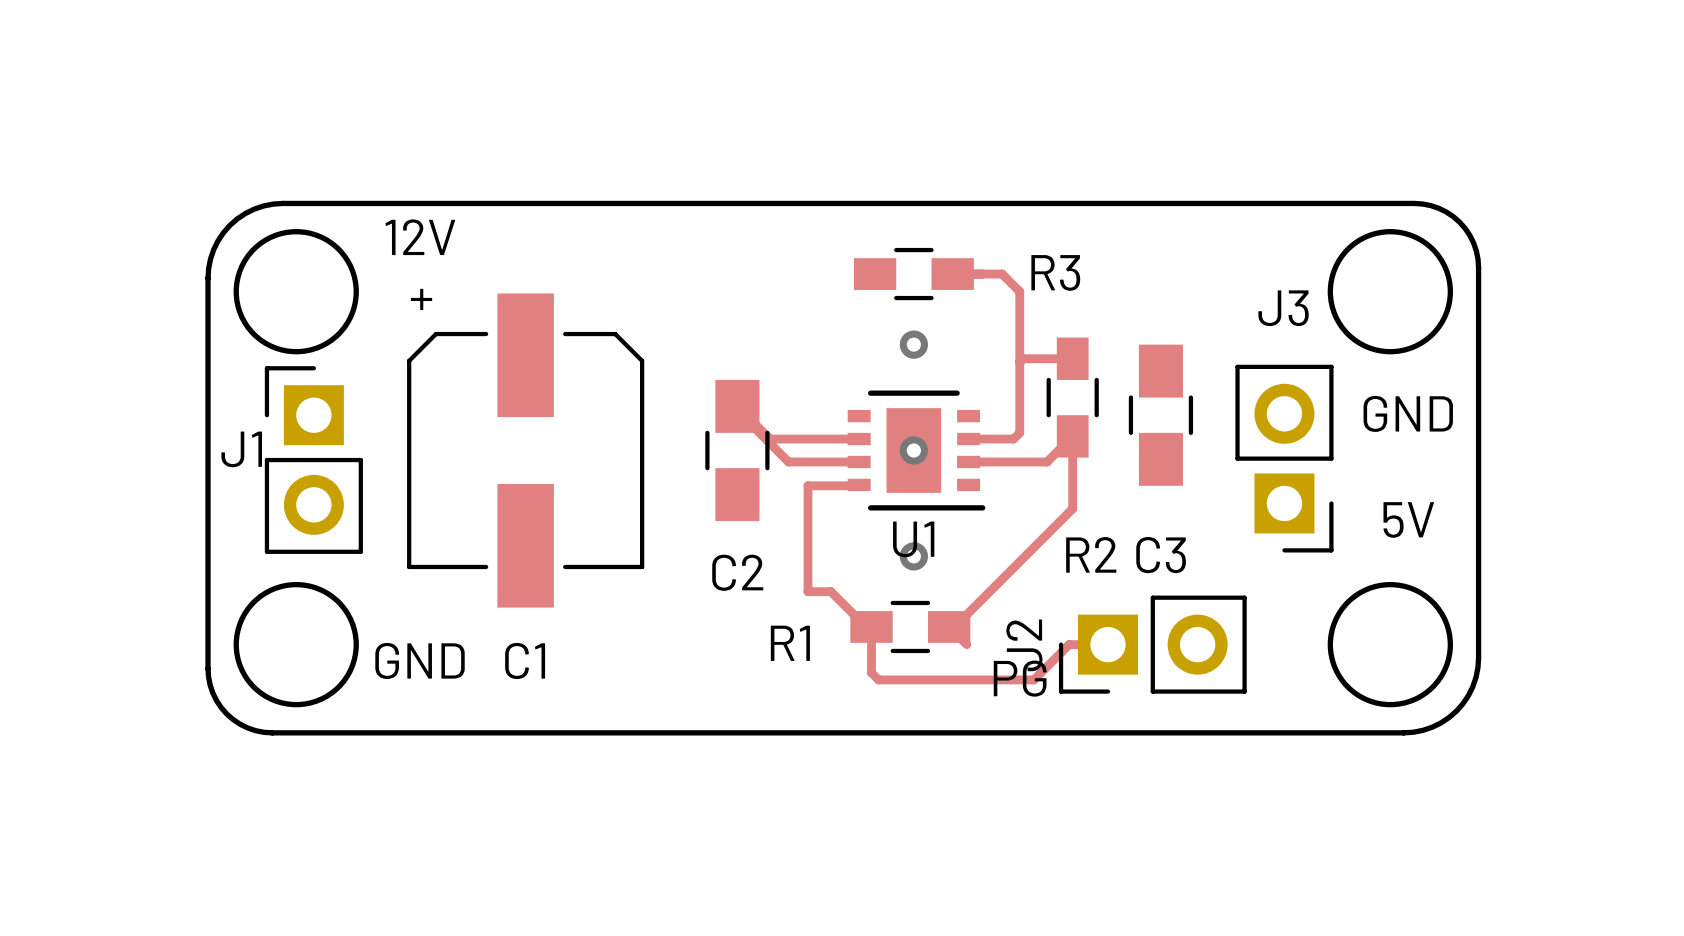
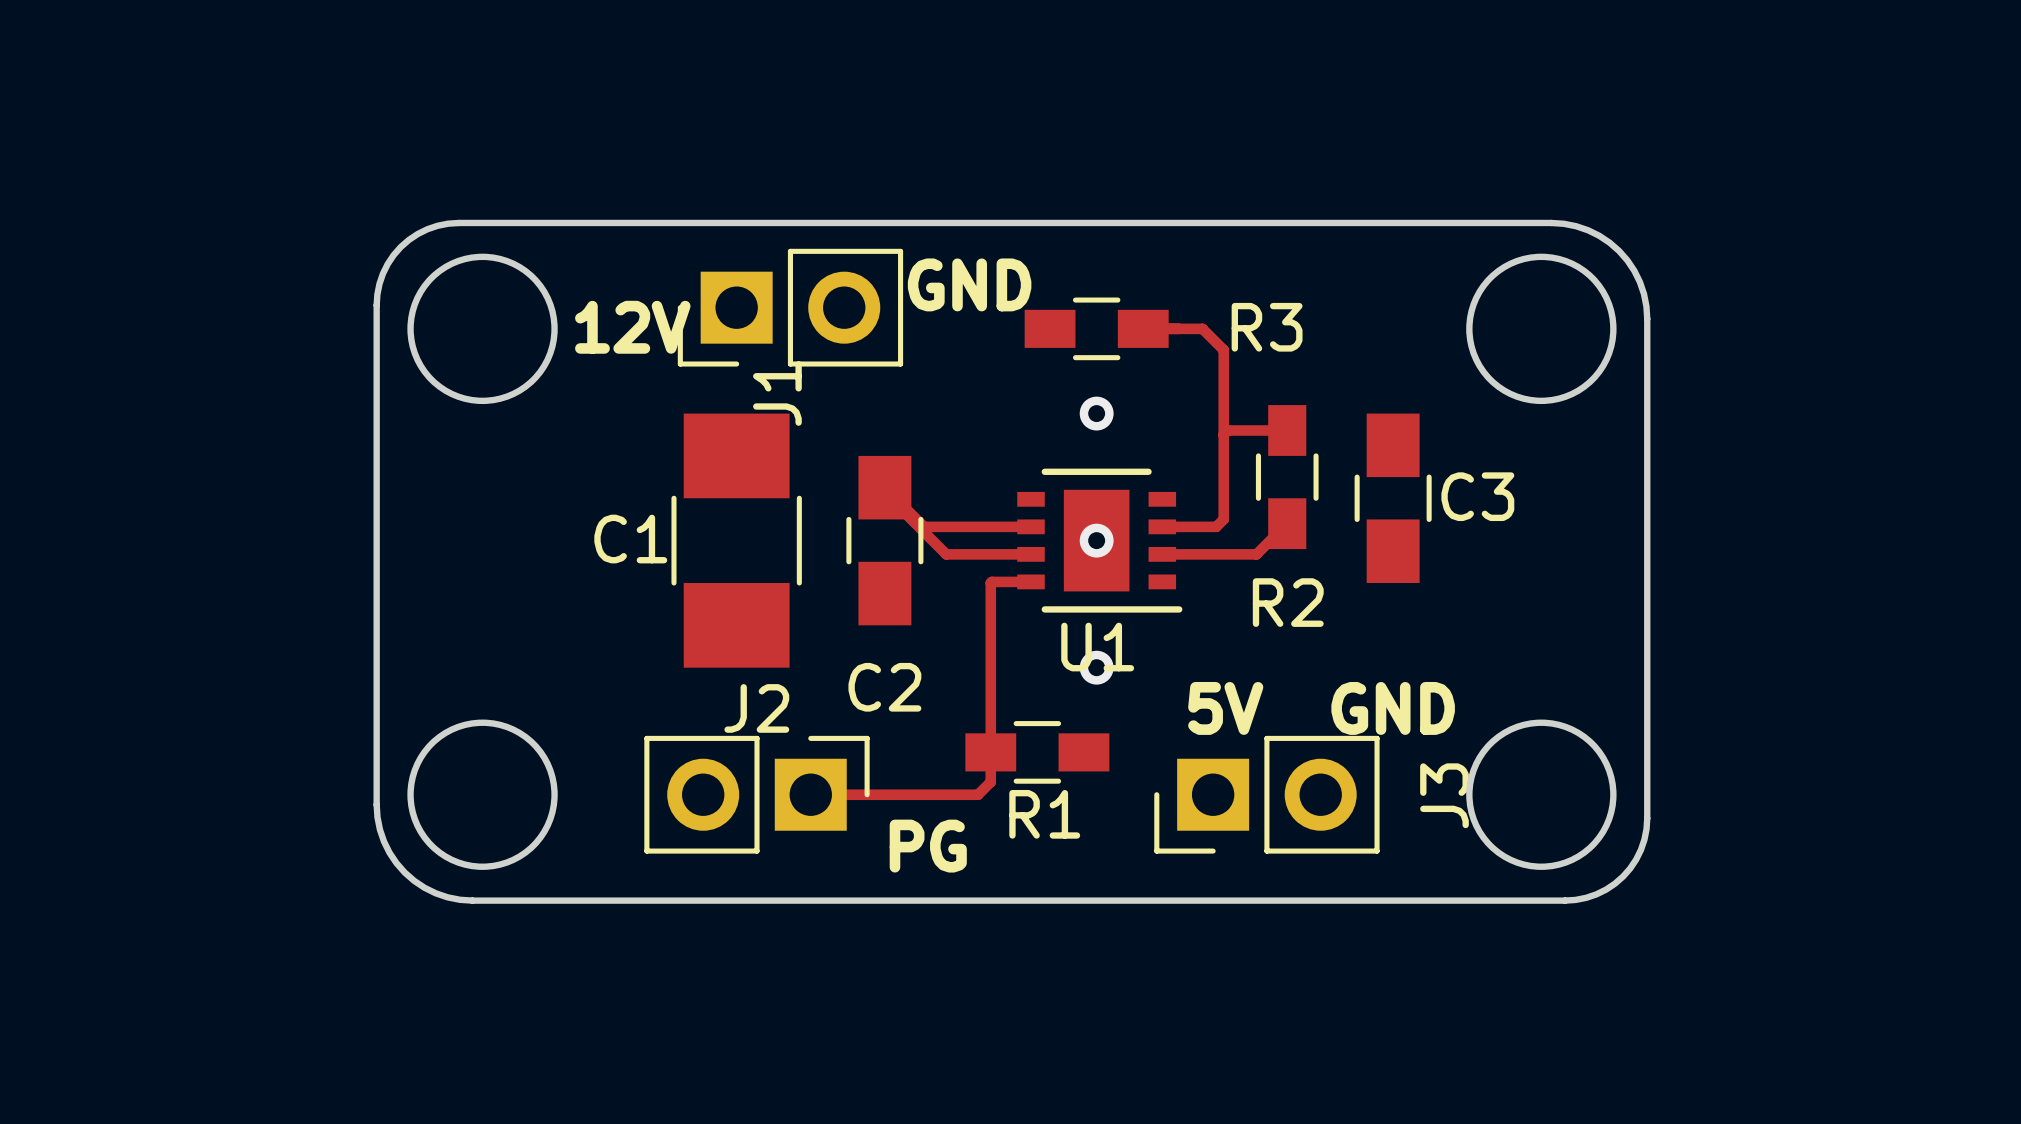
board edge: (282, 203) (1414, 203) (1438, 208) (1453, 216) (1465, 228) (1473, 243) (1478, 259) (1478, 657) (1472, 686) (1463, 703) (1449, 717) (1423, 730) (1403, 732) (272, 732) (247, 727) (233, 719) (221, 707) (212, 693) (208, 676) (208, 268) (218, 240) (237, 218) (263, 206) (282, 203) -> (458, 222) (427, 229) (400, 247) (382, 273) (376, 305) (377, 817) (383, 841) (389, 852) (404, 872) (424, 887) (447, 897) (472, 900) (1564, 900) (1586, 897) (1606, 889) (1623, 876) (1636, 859) (1644, 839) (1647, 818) (1647, 318) (1643, 294) (1634, 270) (1619, 251) (1599, 235) (1576, 226) (1551, 222) (458, 222)
text position: 12V (420, 237) -> 12V (632, 327)
text: none -> GND (969, 284)
round board edge position: (296, 291) -> (482, 328)
round board edge position: (1390, 291) -> (1541, 328)
C1 footprint: [407, 293, 645, 608] -> [671, 413, 802, 668]
text position: GND (1408, 413) -> GND (1393, 708)
track: (1072, 436) (1072, 508) (954, 626) (949, 626) (966, 644) -> none
J3 rotation: 0° (1284, 458) -> 90° clockwise (1266, 794)
J3 position: (1284, 458) -> (1266, 794)
J1 rotation: 0° (313, 460) -> 90° counterclockwise (790, 307)
J1 position: (313, 460) -> (790, 307)
track: (853, 484) (807, 485) (807, 591) (830, 591) (866, 626) (871, 626) (871, 672) (878, 679) (1033, 679) (1069, 644) (1107, 644) -> (1024, 581) (990, 582) (990, 782) (978, 794) (810, 794)
text position: 5V (1408, 519) -> 5V (1225, 708)
R2 name position: R2 (1091, 554) -> R2 (1288, 602)
C3 name position: C3 (1161, 555) -> C3 (1477, 496)
R1 position: (910, 626) -> (1037, 752)
R1 name position: R1 (790, 643) -> R1 (1044, 814)
round board edge position: (296, 644) -> (482, 794)
J2 rotation: 0° (1152, 644) -> 180° (756, 794)
J2 position: (1152, 644) -> (756, 794)
round board edge position: (1390, 644) -> (1541, 794)
J2 name position: J2 (1024, 645) -> J2 (756, 708)
text: GND (420, 660) -> none
C1 name position: C1 (525, 660) -> C1 (630, 539)
text position: PG (1020, 678) -> PG (928, 846)

